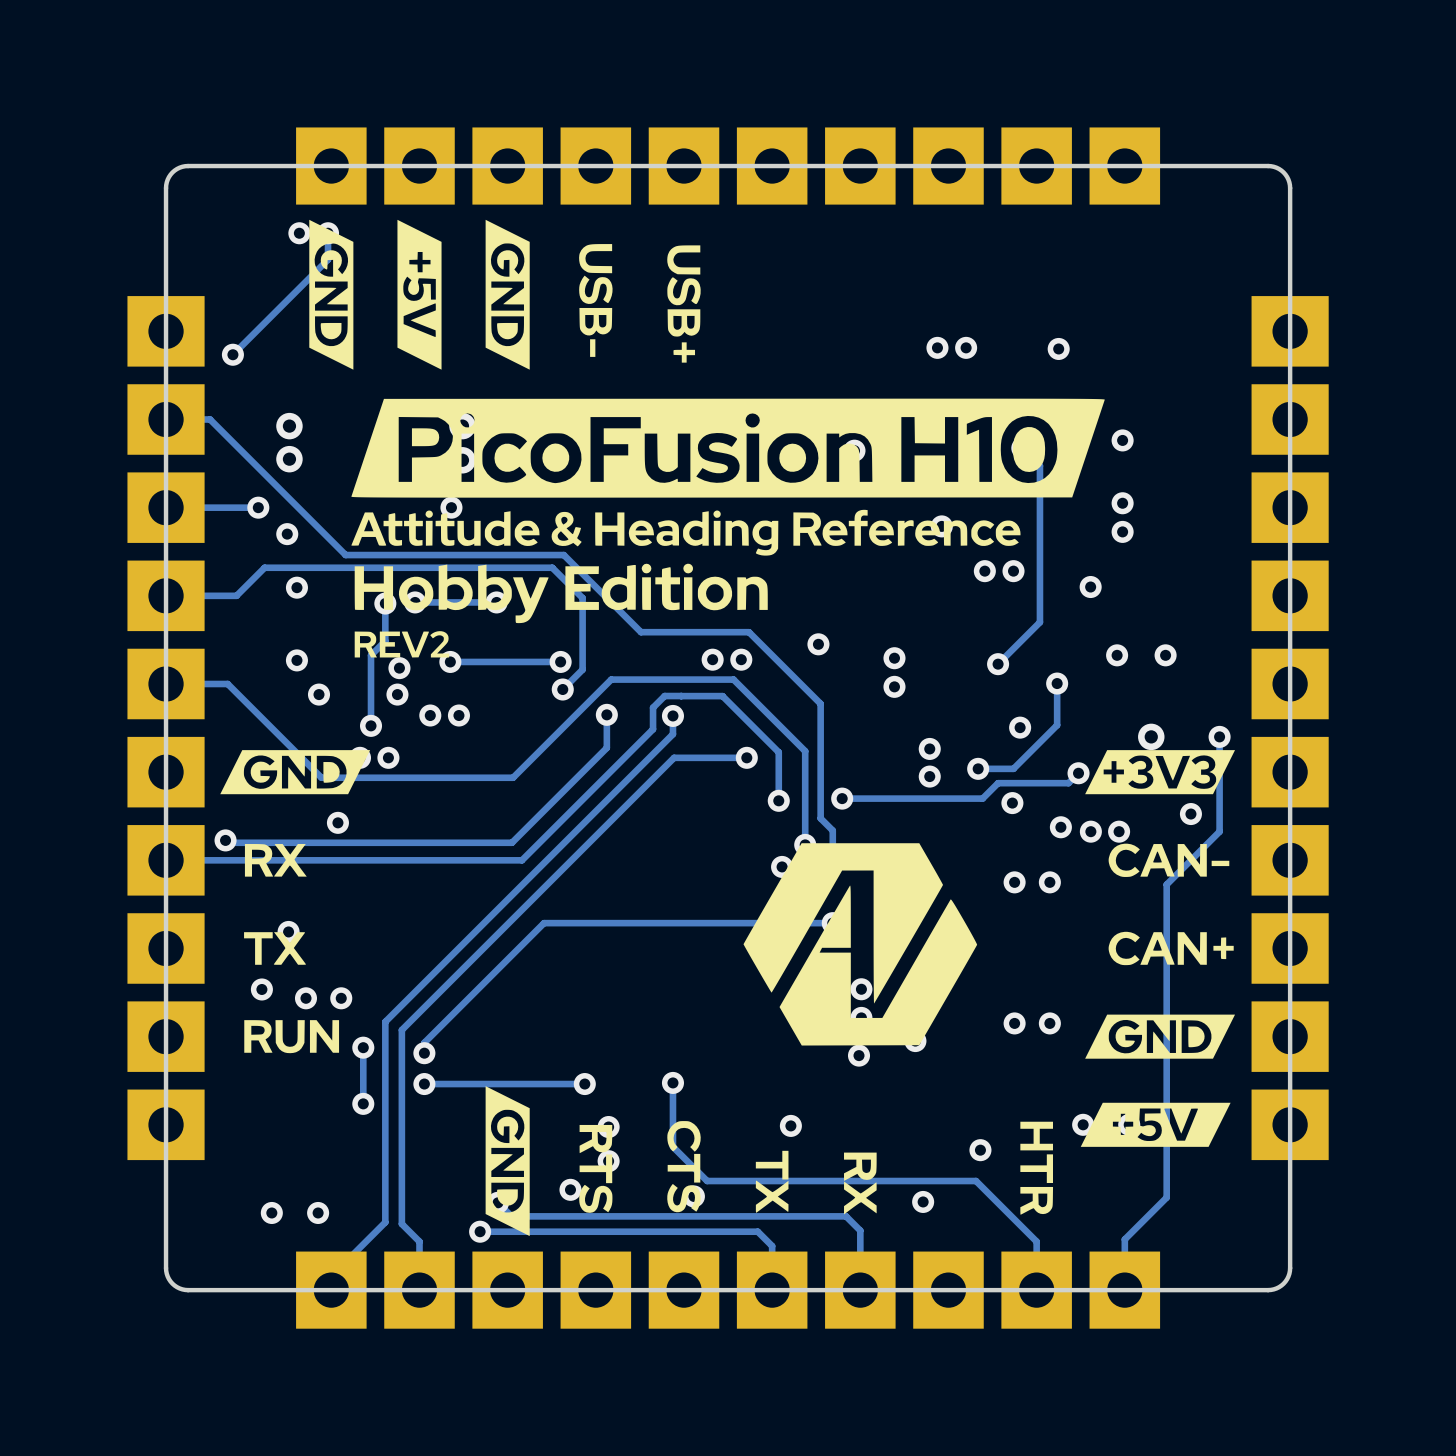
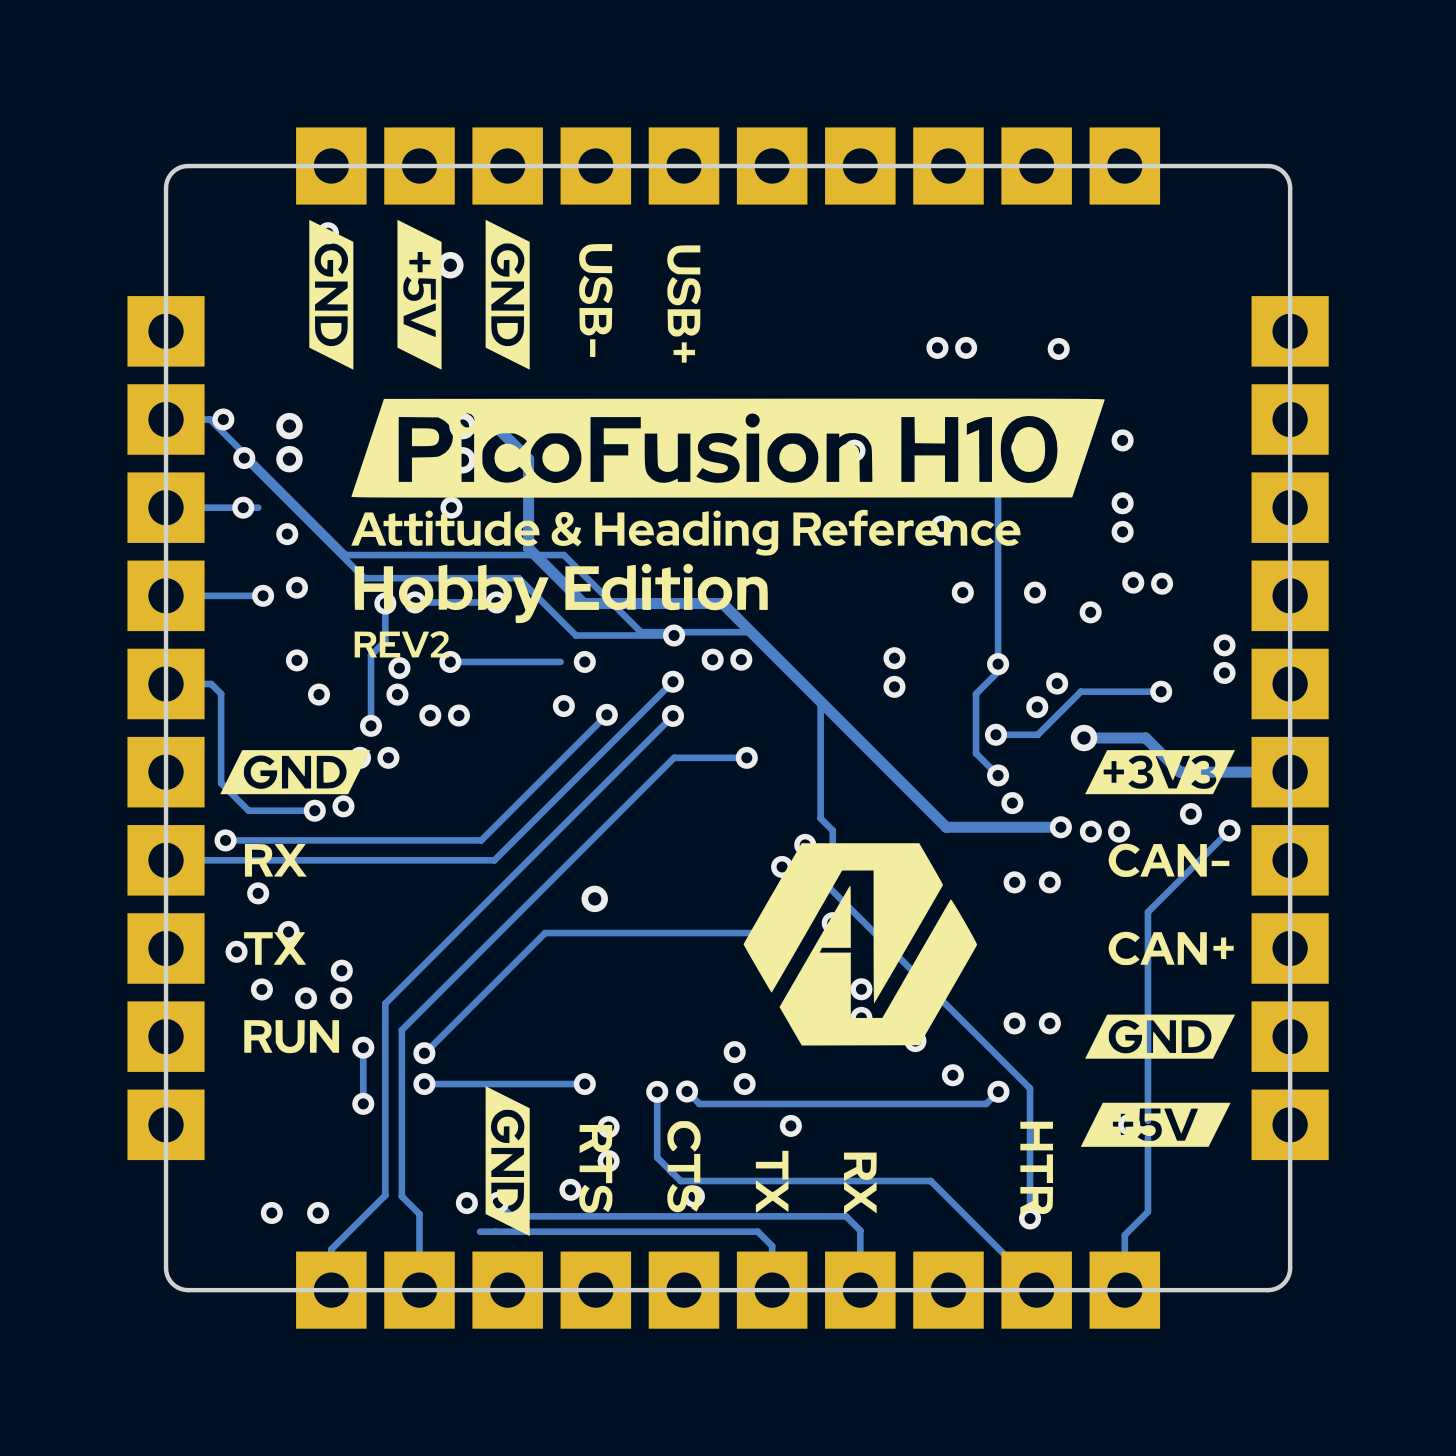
via: (299, 233) -> none
track: (328, 233) (328, 259) (232, 354) -> none
via: none -> (450, 265)
via: (232, 354) -> none
via: none -> (223, 419)
track: none -> (495, 426) (528, 459) (528, 548) (583, 603) (722, 603) (946, 827) (1060, 827)
track: (1022, 448) (1039, 465) (1039, 622) (998, 664) -> none
track: none -> (244, 458) (364, 578) (518, 578) (575, 635) (674, 635)
via: none -> (244, 458)
track: none -> (998, 471) (998, 671) (976, 693) (976, 753) (998, 775)
via position: (258, 507) -> (243, 507)
via position: (984, 571) -> (962, 592)
via position: (1013, 571) -> (1034, 592)
via: none -> (1133, 582)
via: none -> (1162, 583)
via: (1090, 587) -> none
track: (236, 595) (264, 567) (552, 567) (582, 598) (582, 669) (562, 689) -> (236, 595) (263, 595)
via: none -> (263, 595)
via: none -> (1090, 612)
via: none -> (674, 635)
via: (818, 644) -> none
via: none -> (1224, 645)
via: (1117, 655) -> none
via: (1165, 655) -> none
via: (560, 661) -> none
via: none -> (584, 661)
via: none -> (1224, 672)
via: none -> (672, 681)
track: (211, 683) (227, 683) (321, 777) (513, 777) (611, 679) (733, 679) (805, 751) (805, 844) -> (211, 683) (221, 693) (221, 783) (248, 810) (314, 810)
track: (1057, 683) (1057, 725) (1013, 768) (978, 768) -> none
via position: (562, 689) -> (563, 706)
track: none -> (1161, 691) (1080, 691) (1037, 734) (995, 734)
via: none -> (1161, 691)
track: (606, 714) (606, 747) -> (672, 681) (606, 747)
track: (672, 715) (672, 734) (385, 1021) -> (672, 715) (385, 1003) (385, 1021)
via position: (1020, 727) -> (1037, 707)
via: none -> (995, 734)
via position: (1151, 736) -> (1084, 737)
track: (1219, 736) (1219, 831) (1166, 884) (1166, 1197) (1124, 1239) -> (1147, 1137) (1147, 1211) (1124, 1235) (1124, 1239)
via: (1219, 736) -> none
track: none -> (1084, 737) (1145, 737) (1179, 772) (1284, 772)
via: (929, 748) -> none
via position: (978, 768) -> (998, 775)
track: (1078, 773) (1068, 783) (998, 783) (982, 798) (842, 798) -> none
via: (1078, 773) -> none
via: (929, 776) -> none
via: (842, 798) -> none
track: (778, 800) (778, 752) (722, 696) (664, 696) (653, 707) (653, 729) (521, 860) (494, 860) -> (511, 842) (494, 860)
via: (778, 800) -> none
via: none -> (314, 810)
via position: (337, 822) -> (343, 806)
track: none -> (1229, 830) (1147, 912) (1147, 1120)
via: none -> (1229, 830)
track: (225, 840) (227, 842) (511, 842) -> (225, 840) (481, 840) (606, 714)
track: none -> (808, 866) (1030, 1088) (1030, 1218)
via: none -> (258, 893)
via: none -> (594, 898)
track: (832, 923) (544, 923) (424, 1042) (424, 1053) -> (778, 933) (545, 933) (425, 1053)
via: none -> (236, 951)
via: none -> (341, 970)
via: none -> (734, 1052)
via: (859, 1055) -> none
via: none -> (952, 1075)
track: (672, 1082) (672, 1146) (707, 1181) -> (657, 1091) (657, 1157) (680, 1181) (707, 1181)
via: (672, 1082) -> none
via: none -> (744, 1084)
via: none -> (657, 1091)
track: none -> (687, 1091) (699, 1103) (986, 1103) (998, 1091)
via: none -> (687, 1091)
via: none -> (998, 1091)
via: (1083, 1124) -> none
via: (980, 1150) -> none
track: (930, 1181) (976, 1181) (1036, 1241) (1036, 1286) -> (930, 1181) (1036, 1286)
track: (385, 1195) (385, 1222) (331, 1276) -> (385, 1195) (331, 1249) (331, 1276)
track: (401, 1196) (401, 1224) (419, 1241) -> (401, 1196) (419, 1214) (419, 1241)
via: (923, 1201) -> none
via: none -> (1030, 1218)
via position: (480, 1231) -> (466, 1203)

